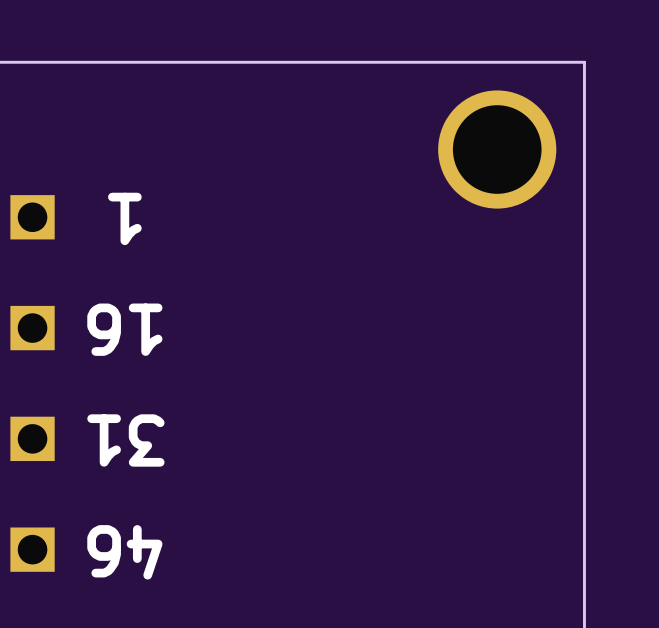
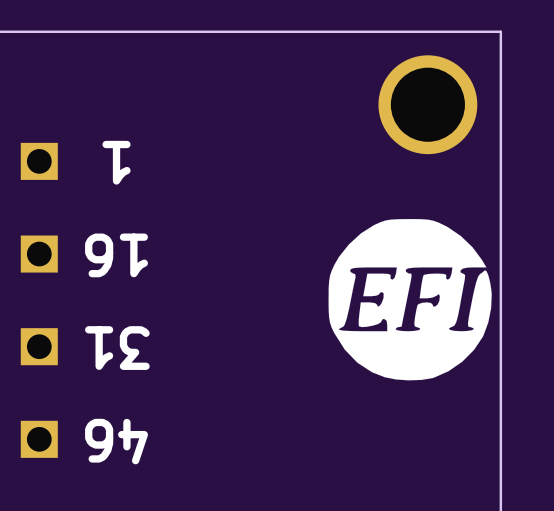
drawing: none -> [328, 219, 492, 381]

